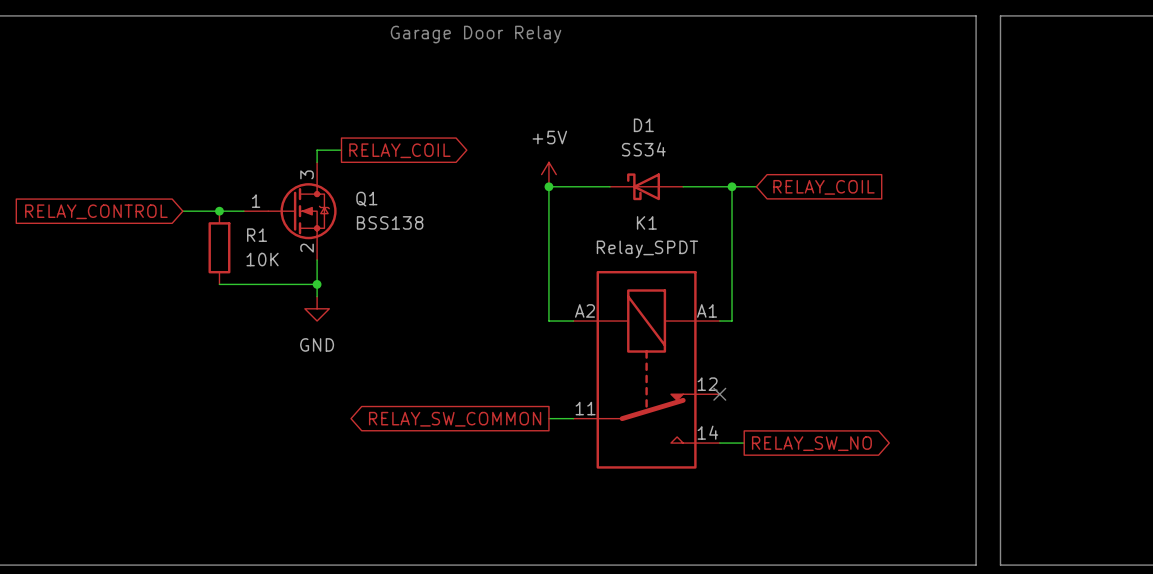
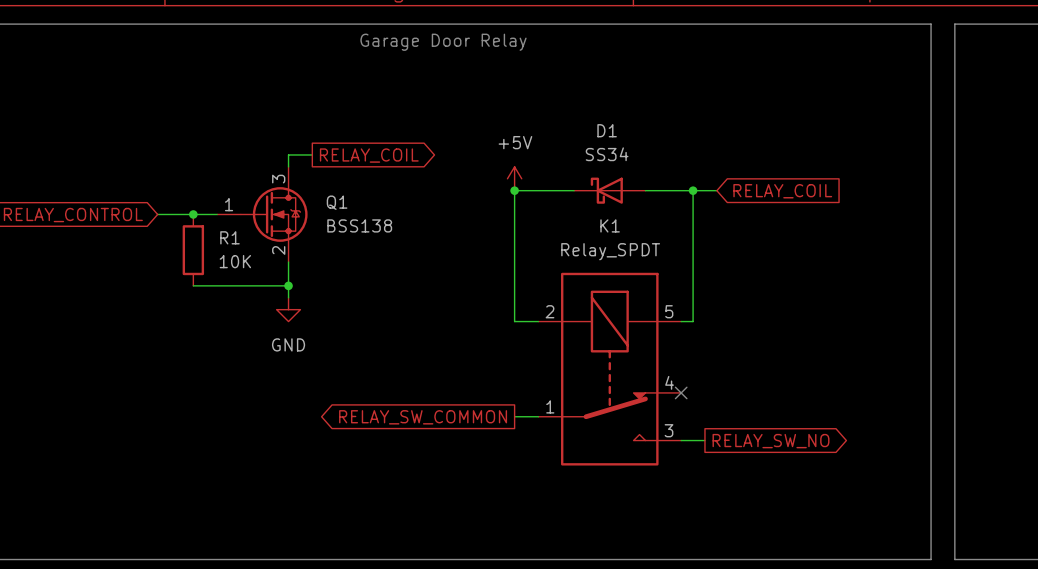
K1 pin number: A2 (584, 310) -> 2 (550, 311)
K1 pin number: A1 (707, 310) -> 5 (669, 311)
K1 pin number: 12 (707, 384) -> 4 (669, 382)
K1 pin number: 11 (585, 408) -> 1 (550, 406)
K1 pin number: 14 (707, 432) -> 3 (669, 430)

